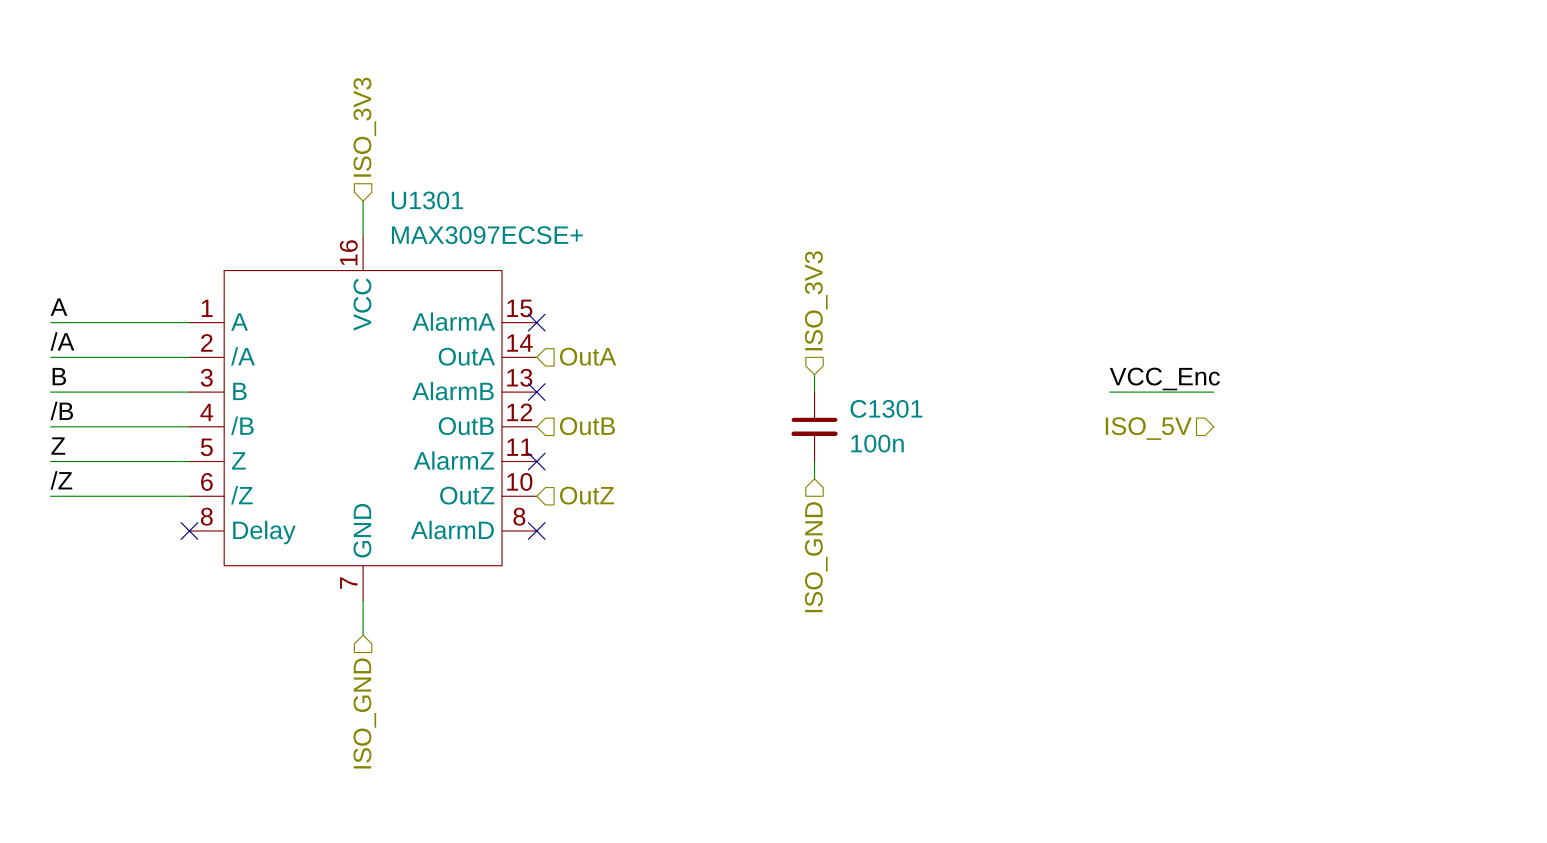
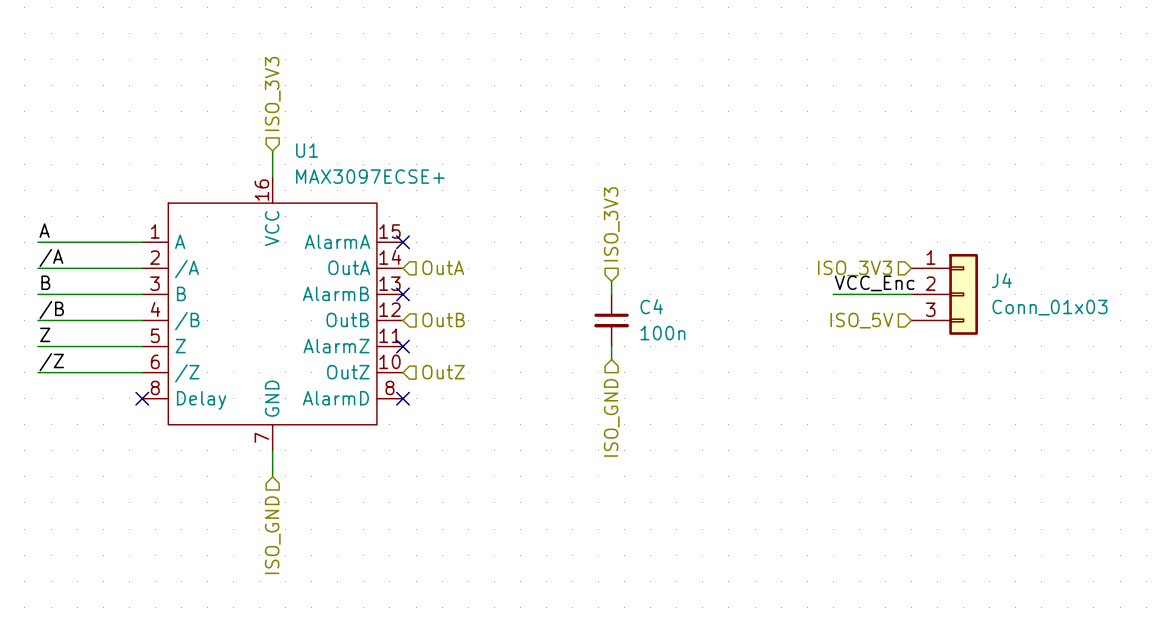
U1301 name: U1301 (427, 200) -> U1 (307, 150)
hierarchical label: none -> ISO_3V3 (855, 268)
J4: none -> Conn_01x03 (944, 294)
C1301 name: C1301 (886, 408) -> C4 (651, 306)

